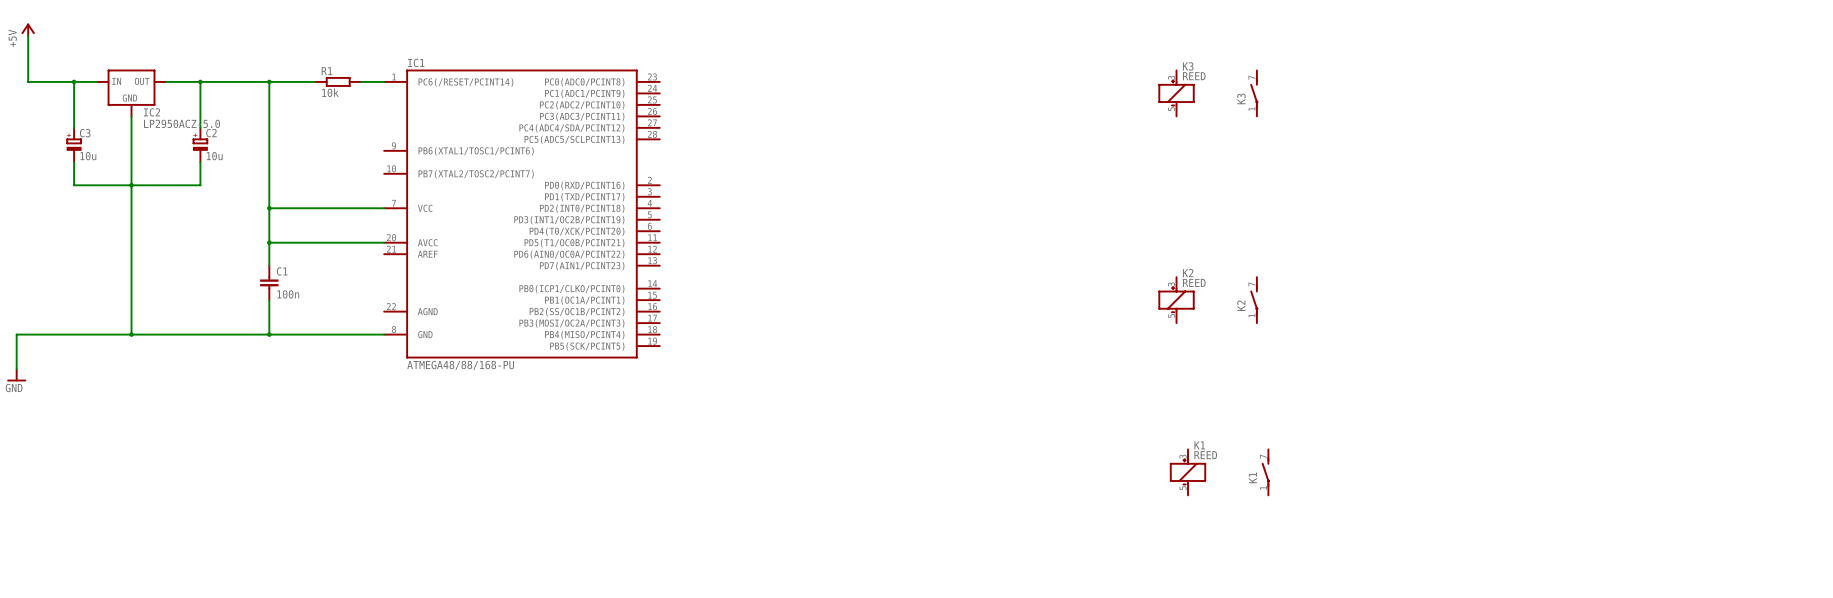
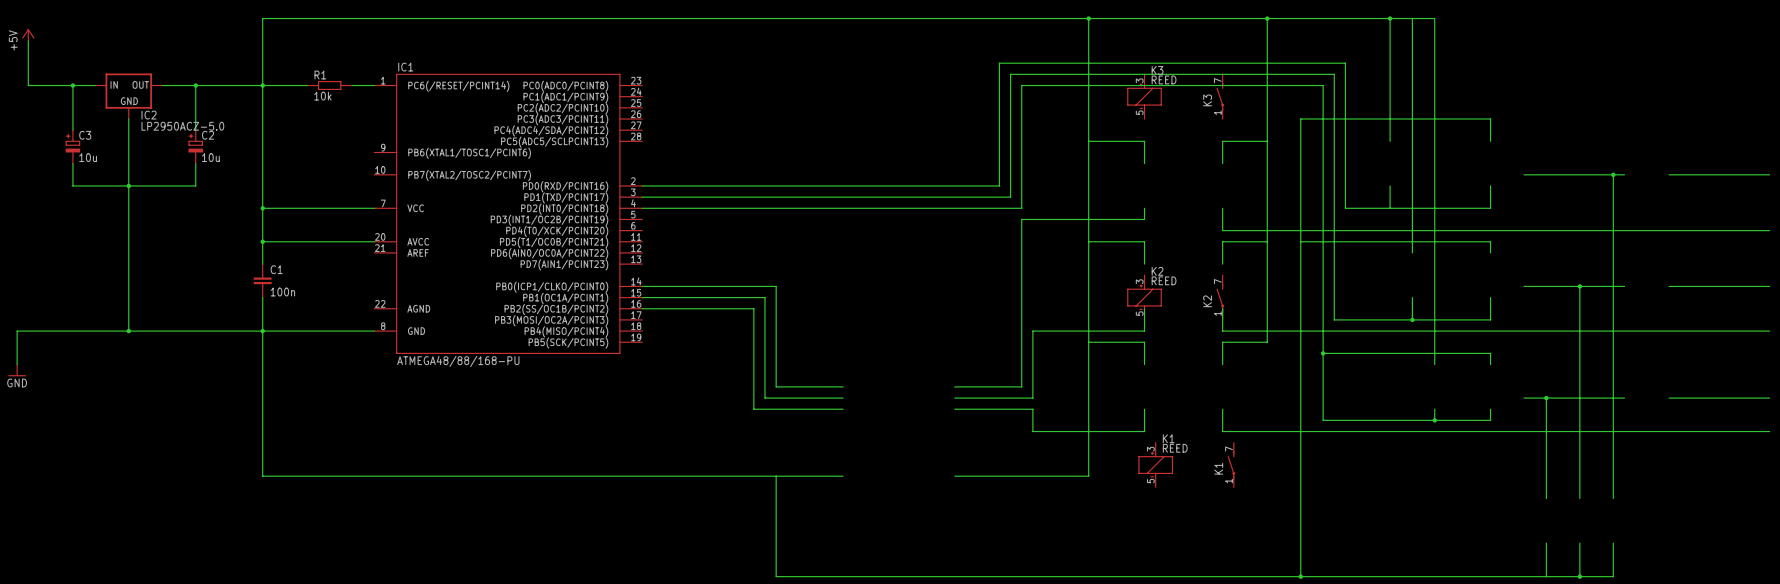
wire: none -> (1088, 18) (1088, 476) (954, 476)
junction: none -> (1088, 18)
wire: none -> (1267, 18) (1267, 342) (1222, 342) (1222, 364)
junction: none -> (1267, 18)
wire: none -> (1390, 18) (1390, 141)
junction: none -> (1390, 18)
wire: none -> (1412, 18) (1412, 252)
wire: none -> (262, 85) (262, 18) (1434, 18) (1434, 364)
wire: none -> (1088, 141) (1144, 141) (1144, 163)
wire: none -> (1267, 141) (1222, 141) (1222, 163)
wire: none -> (1490, 141) (1490, 119) (1300, 119) (1300, 576)
wire: none -> (1524, 174) (1624, 174)
wire: none -> (1613, 174) (1613, 498)
junction: none -> (1613, 174)
wire: none -> (1669, 174) (1769, 174)
wire: none -> (642, 185) (999, 185) (999, 63) (1345, 63) (1345, 208) (1490, 208) (1490, 185)
wire: none -> (1390, 185) (1390, 208)
wire: none -> (642, 197) (1010, 197) (1010, 74) (1334, 74) (1334, 319) (1490, 319) (1490, 297)
wire: none -> (642, 208) (1021, 208) (1021, 85) (1323, 85) (1323, 420) (1490, 420) (1490, 409)
wire: none -> (1144, 208) (1144, 219) (1021, 219) (1021, 386) (954, 386)
wire: none -> (1222, 208) (1222, 230) (1769, 230)
wire: none -> (1088, 241) (1144, 241) (1144, 264)
wire: none -> (1267, 241) (1222, 241) (1222, 264)
wire: none -> (1300, 241) (1490, 241) (1490, 252)
wire: none -> (642, 286) (776, 286) (776, 386) (843, 386)
wire: none -> (1524, 286) (1624, 286)
wire: none -> (1579, 286) (1579, 498)
junction: none -> (1579, 286)
wire: none -> (1669, 286) (1769, 286)
wire: none -> (642, 297) (765, 297) (765, 398) (843, 398)
wire: none -> (1412, 297) (1412, 319)
wire: none -> (642, 308) (753, 308) (753, 409) (843, 409)
wire: none -> (1144, 308) (1144, 331) (1032, 331) (1032, 398) (954, 398)
wire: none -> (1222, 308) (1222, 331) (1769, 331)
junction: none -> (1412, 319)
wire: none -> (262, 331) (262, 476) (843, 476)
wire: none -> (1088, 342) (1144, 342) (1144, 364)
wire: none -> (1323, 353) (1490, 353) (1490, 364)
junction: none -> (1323, 353)
wire: none -> (1524, 398) (1624, 398)
wire: none -> (1546, 398) (1546, 498)
junction: none -> (1546, 398)
wire: none -> (1669, 398) (1769, 398)
wire: none -> (954, 409) (1032, 409) (1032, 431) (1144, 431) (1144, 409)
wire: none -> (1222, 409) (1222, 431) (1769, 431)
wire: none -> (1434, 409) (1434, 420)
junction: none -> (1434, 420)
wire: none -> (776, 476) (776, 576) (1613, 576) (1613, 543)
wire: none -> (1546, 543) (1546, 576)
wire: none -> (1579, 543) (1579, 576)
junction: none -> (1300, 576)
junction: none -> (1579, 576)

